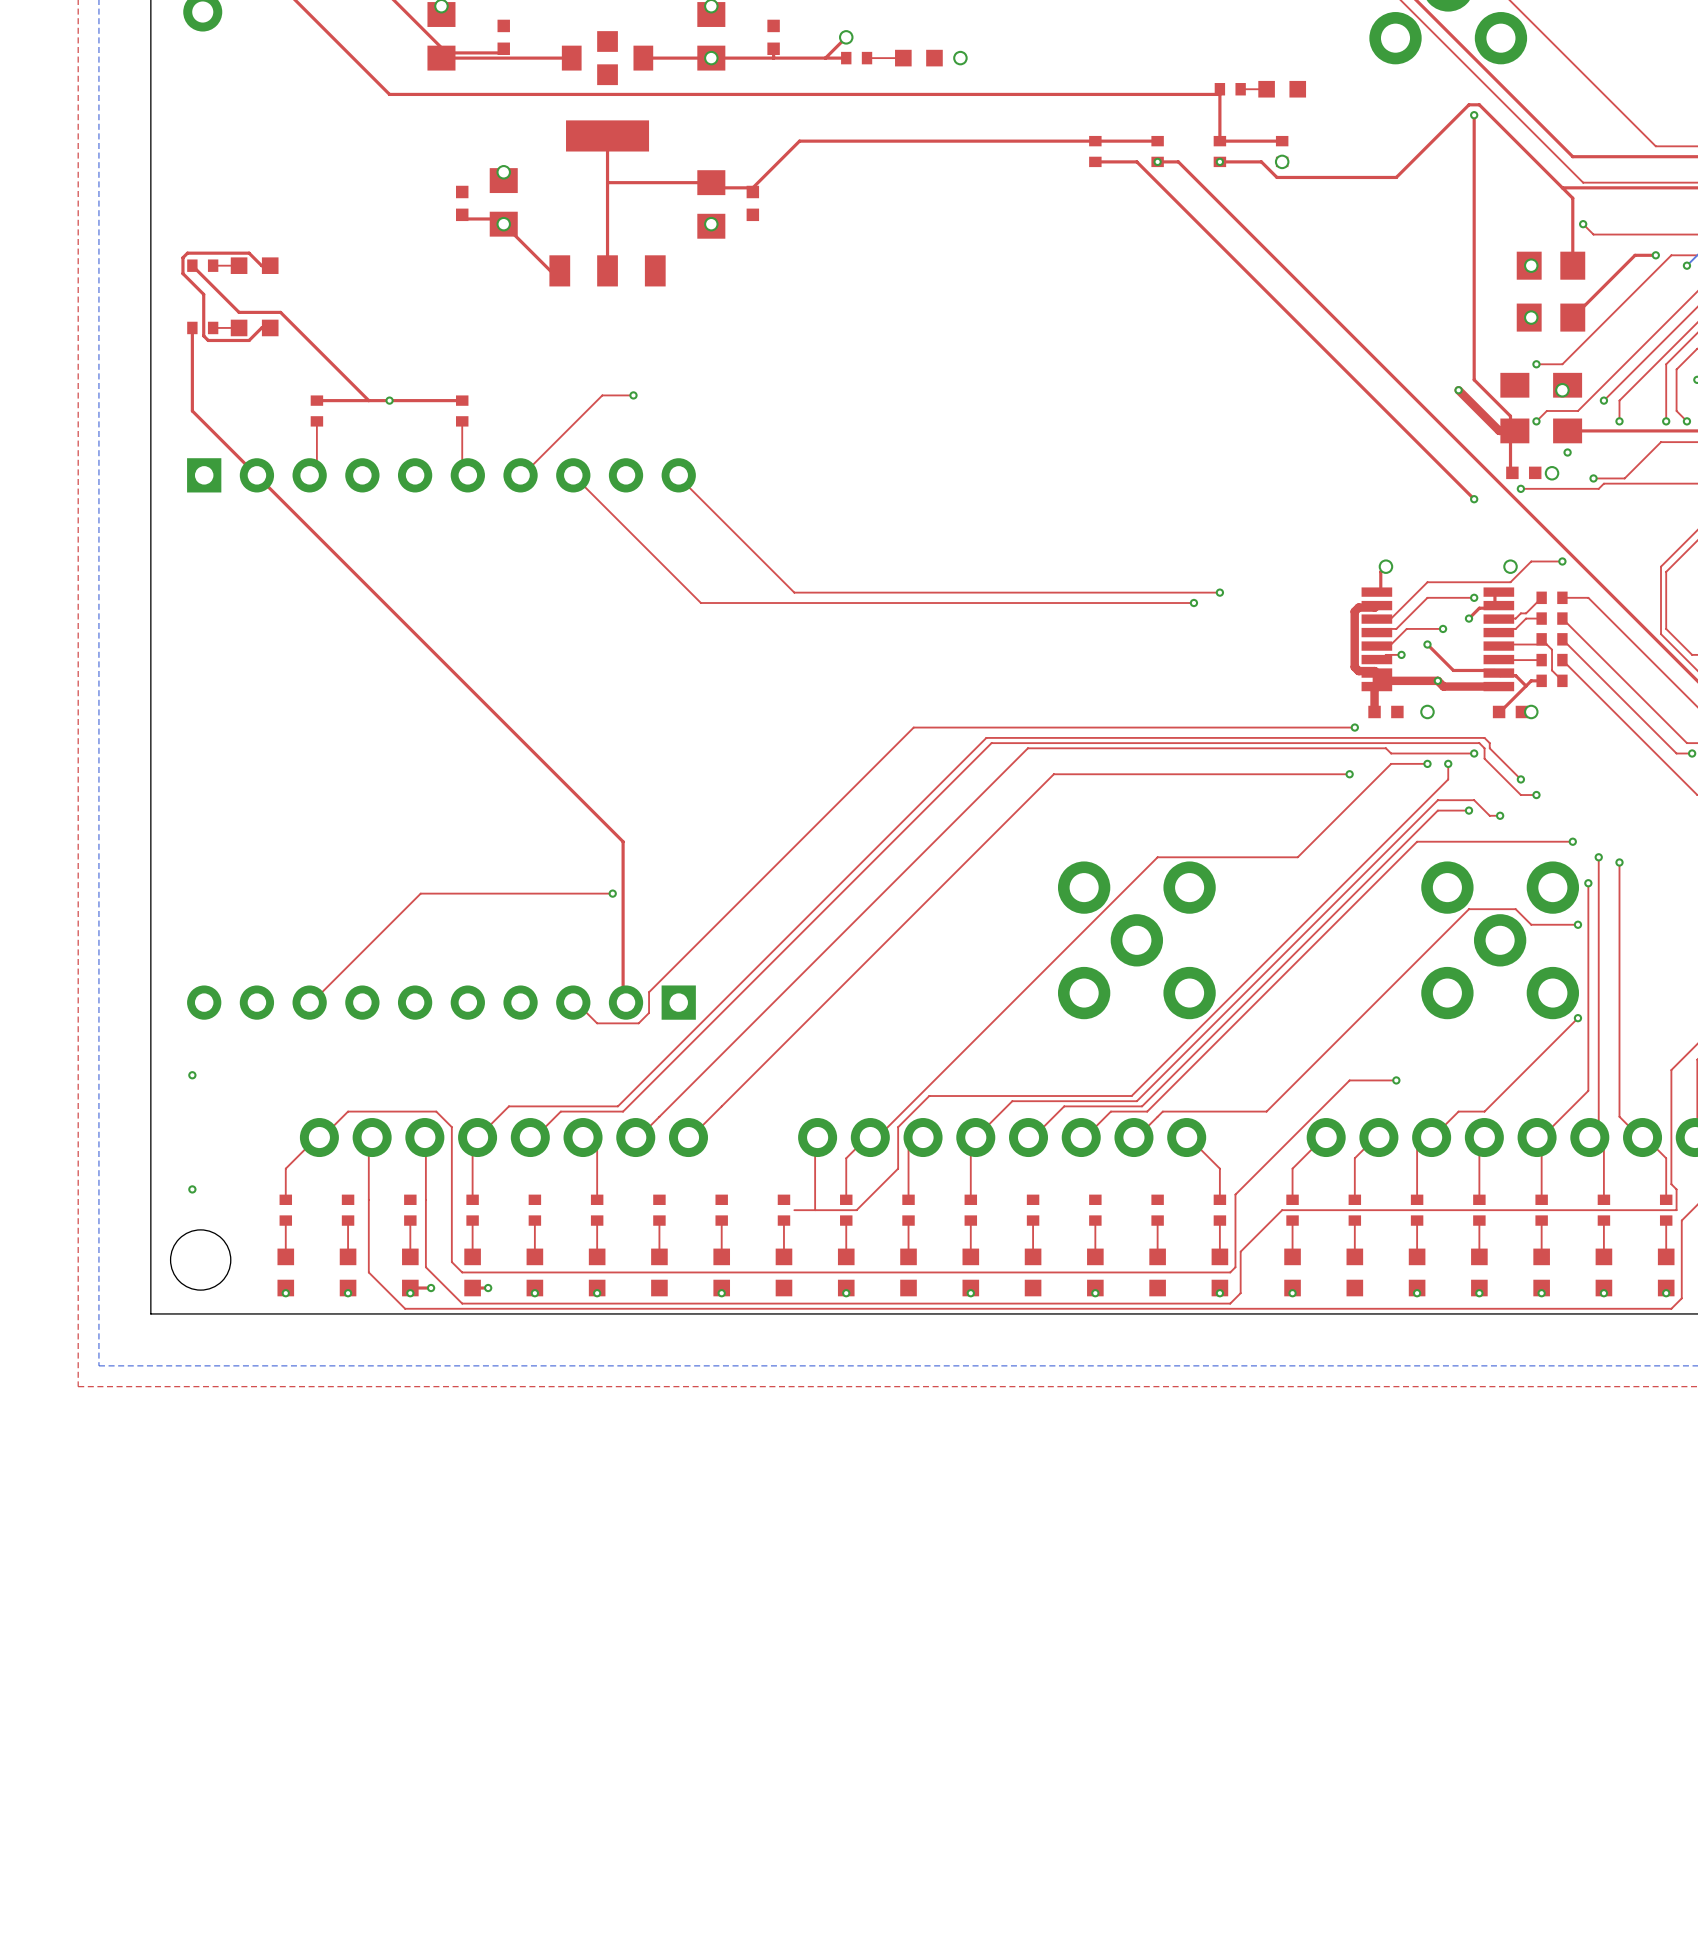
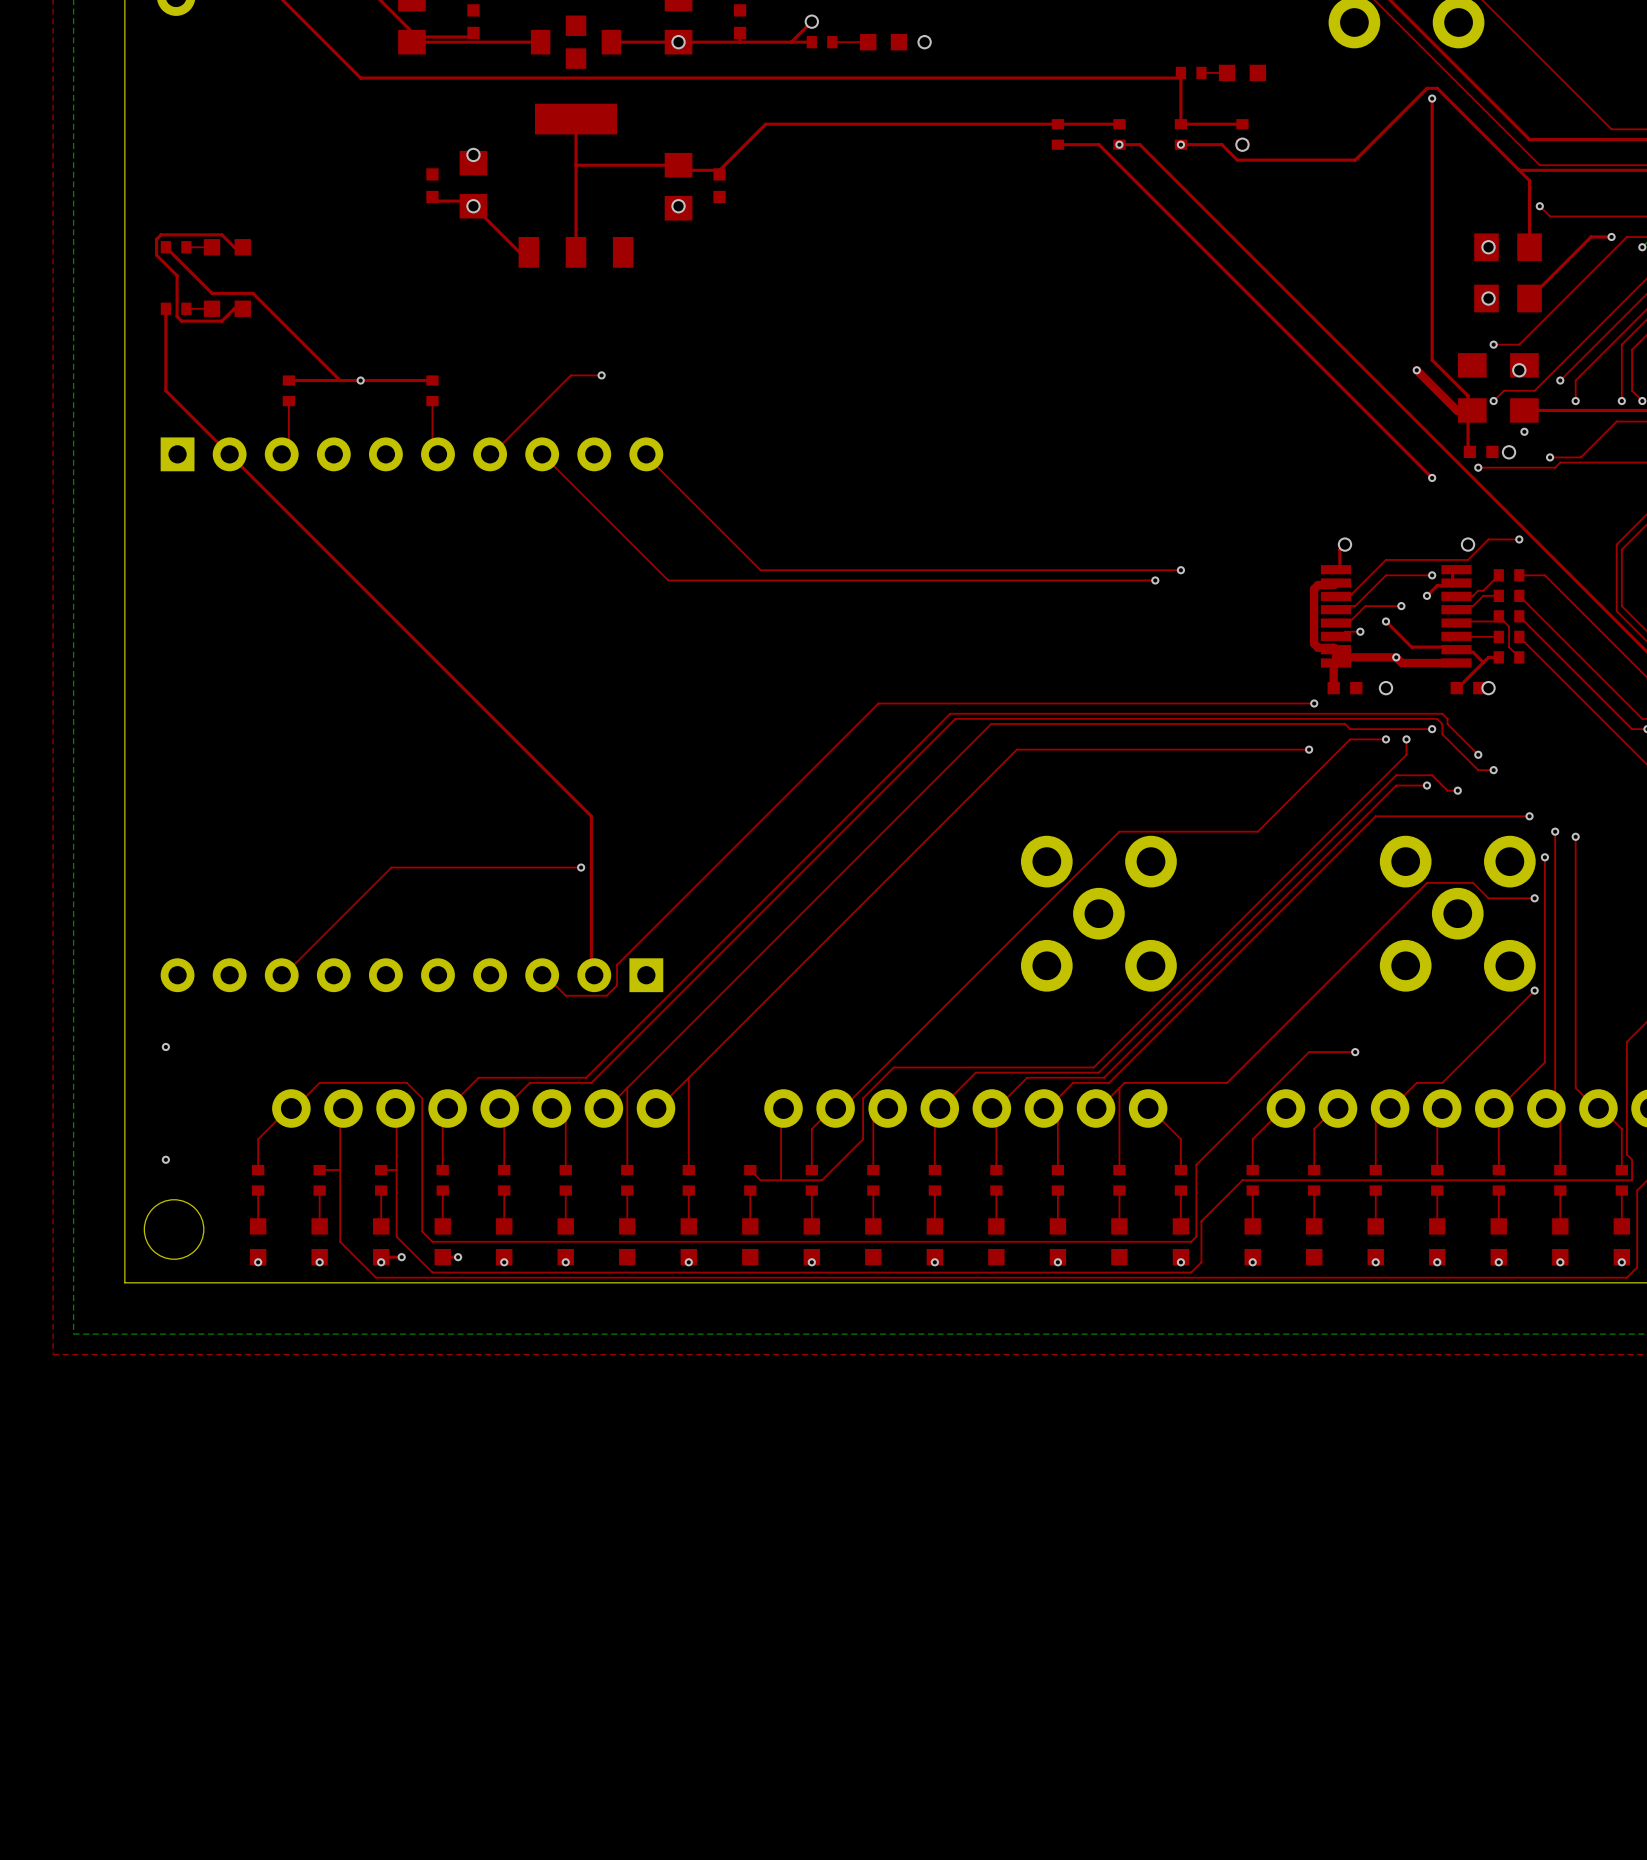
top track: none -> (688, 1077) (688, 1170)
top track: none -> (627, 1088) (627, 1170)
top track: none -> (1119, 1088) (1119, 1170)
top track: none -> (499, 1108) (504, 1108) (504, 1170)
top track: none -> (991, 1108) (996, 1108) (996, 1170)
top track: none -> (1047, 1108) (1043, 1108) (1057, 1098) (1057, 1170)
top track: none -> (340, 1170) (319, 1170)
top track: none -> (396, 1170) (381, 1170)
top track: none -> (750, 1170) (760, 1180)

